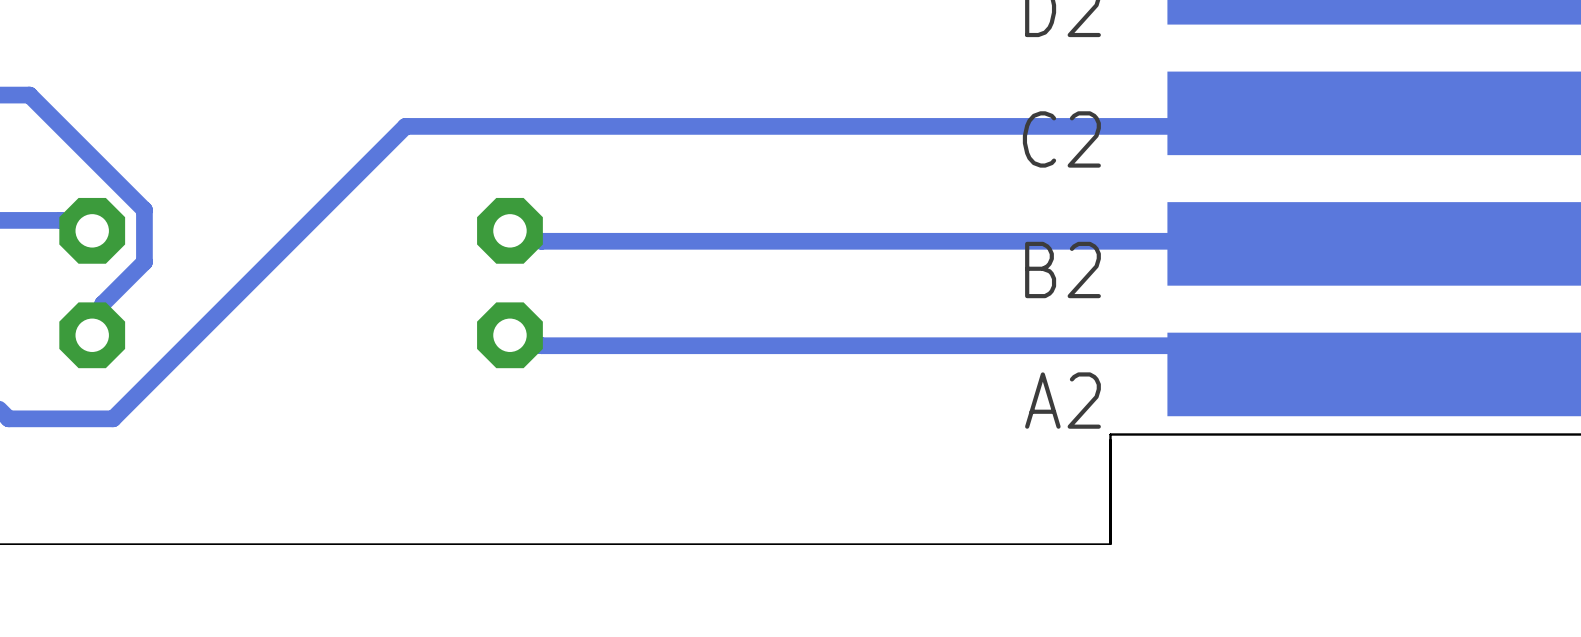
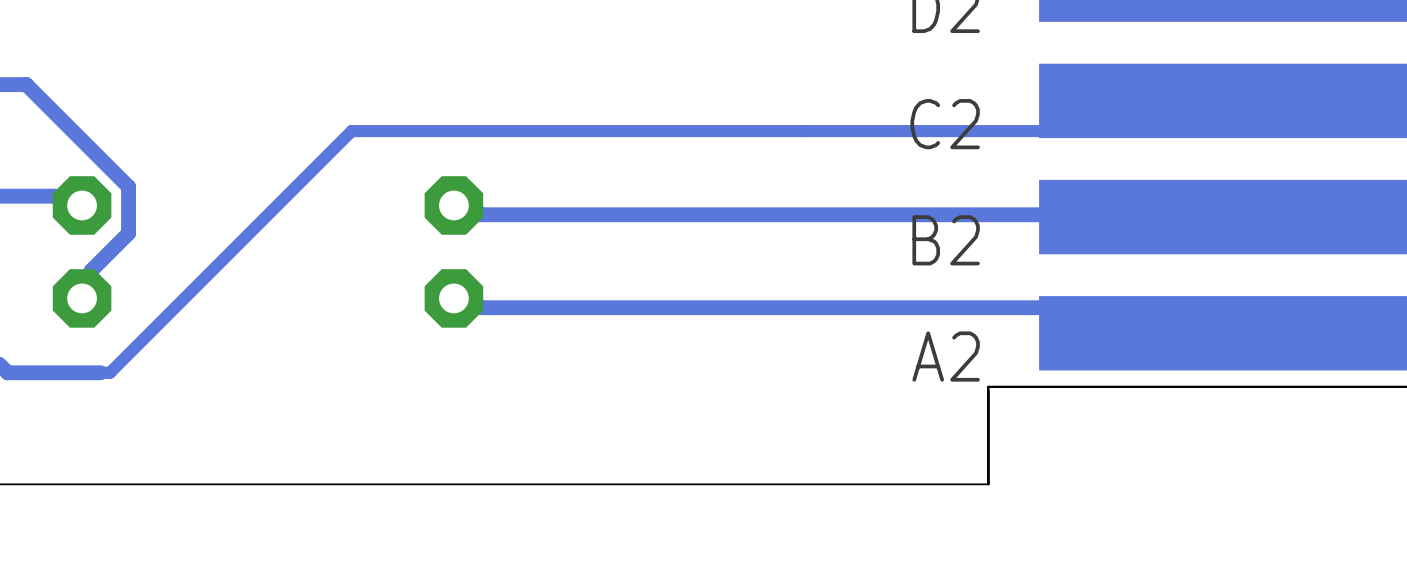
bottom track: (1436, 113) (1199, 126) (405, 126) (113, 418) -> (1278, 100) (1058, 131) (351, 131) (109, 372) (100, 372)

